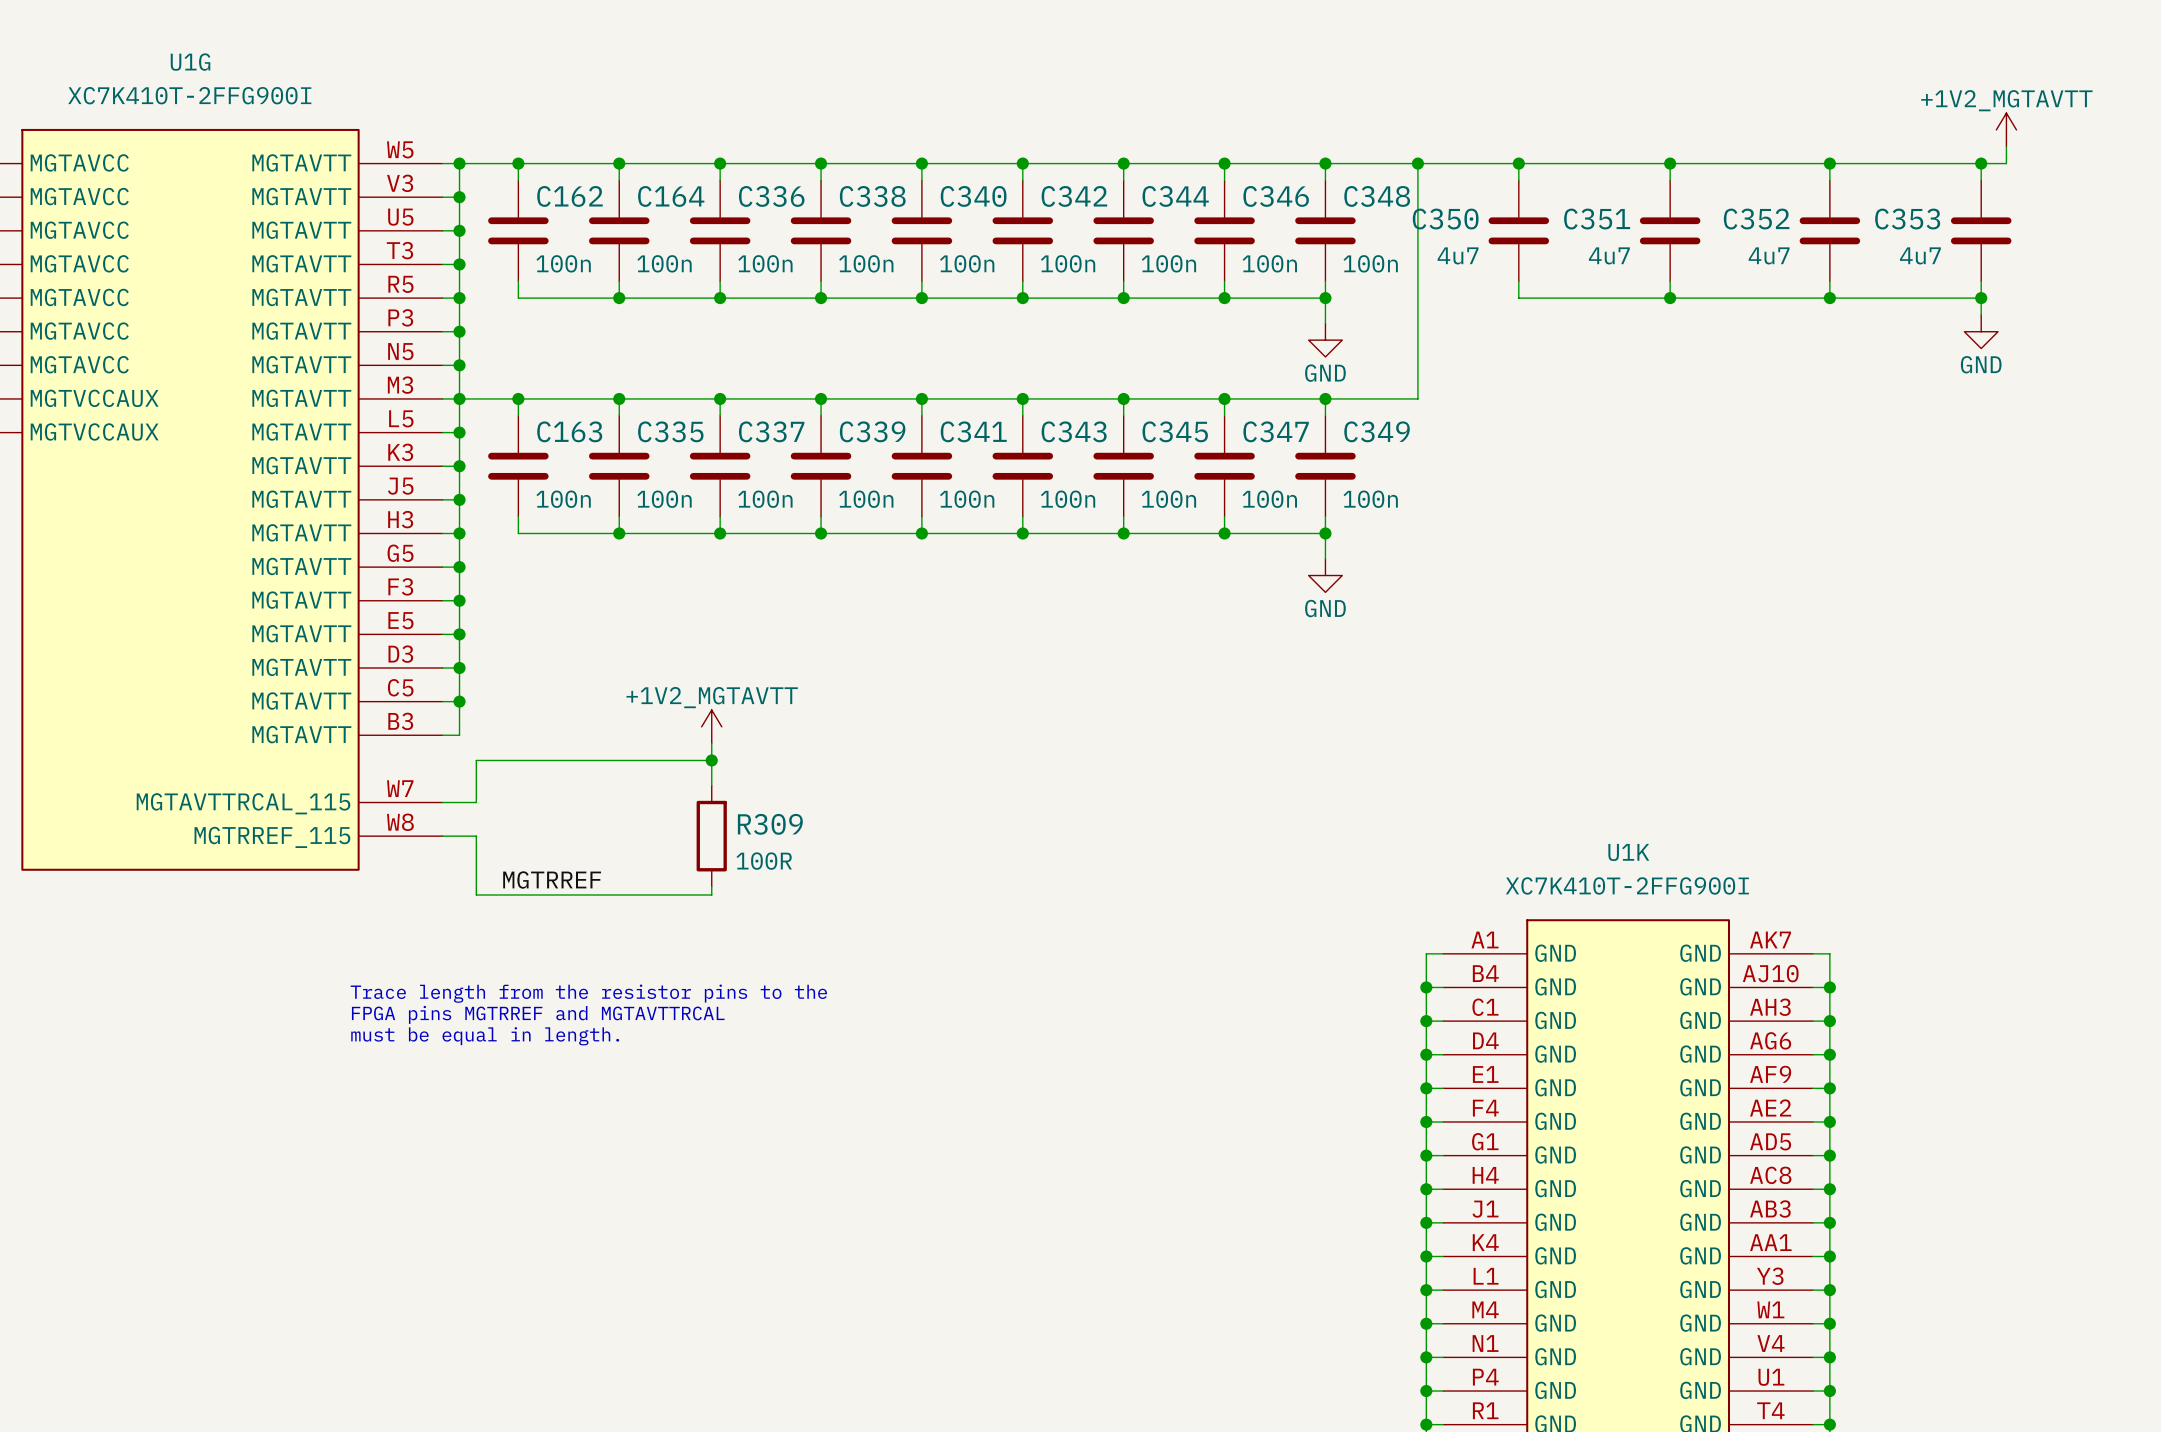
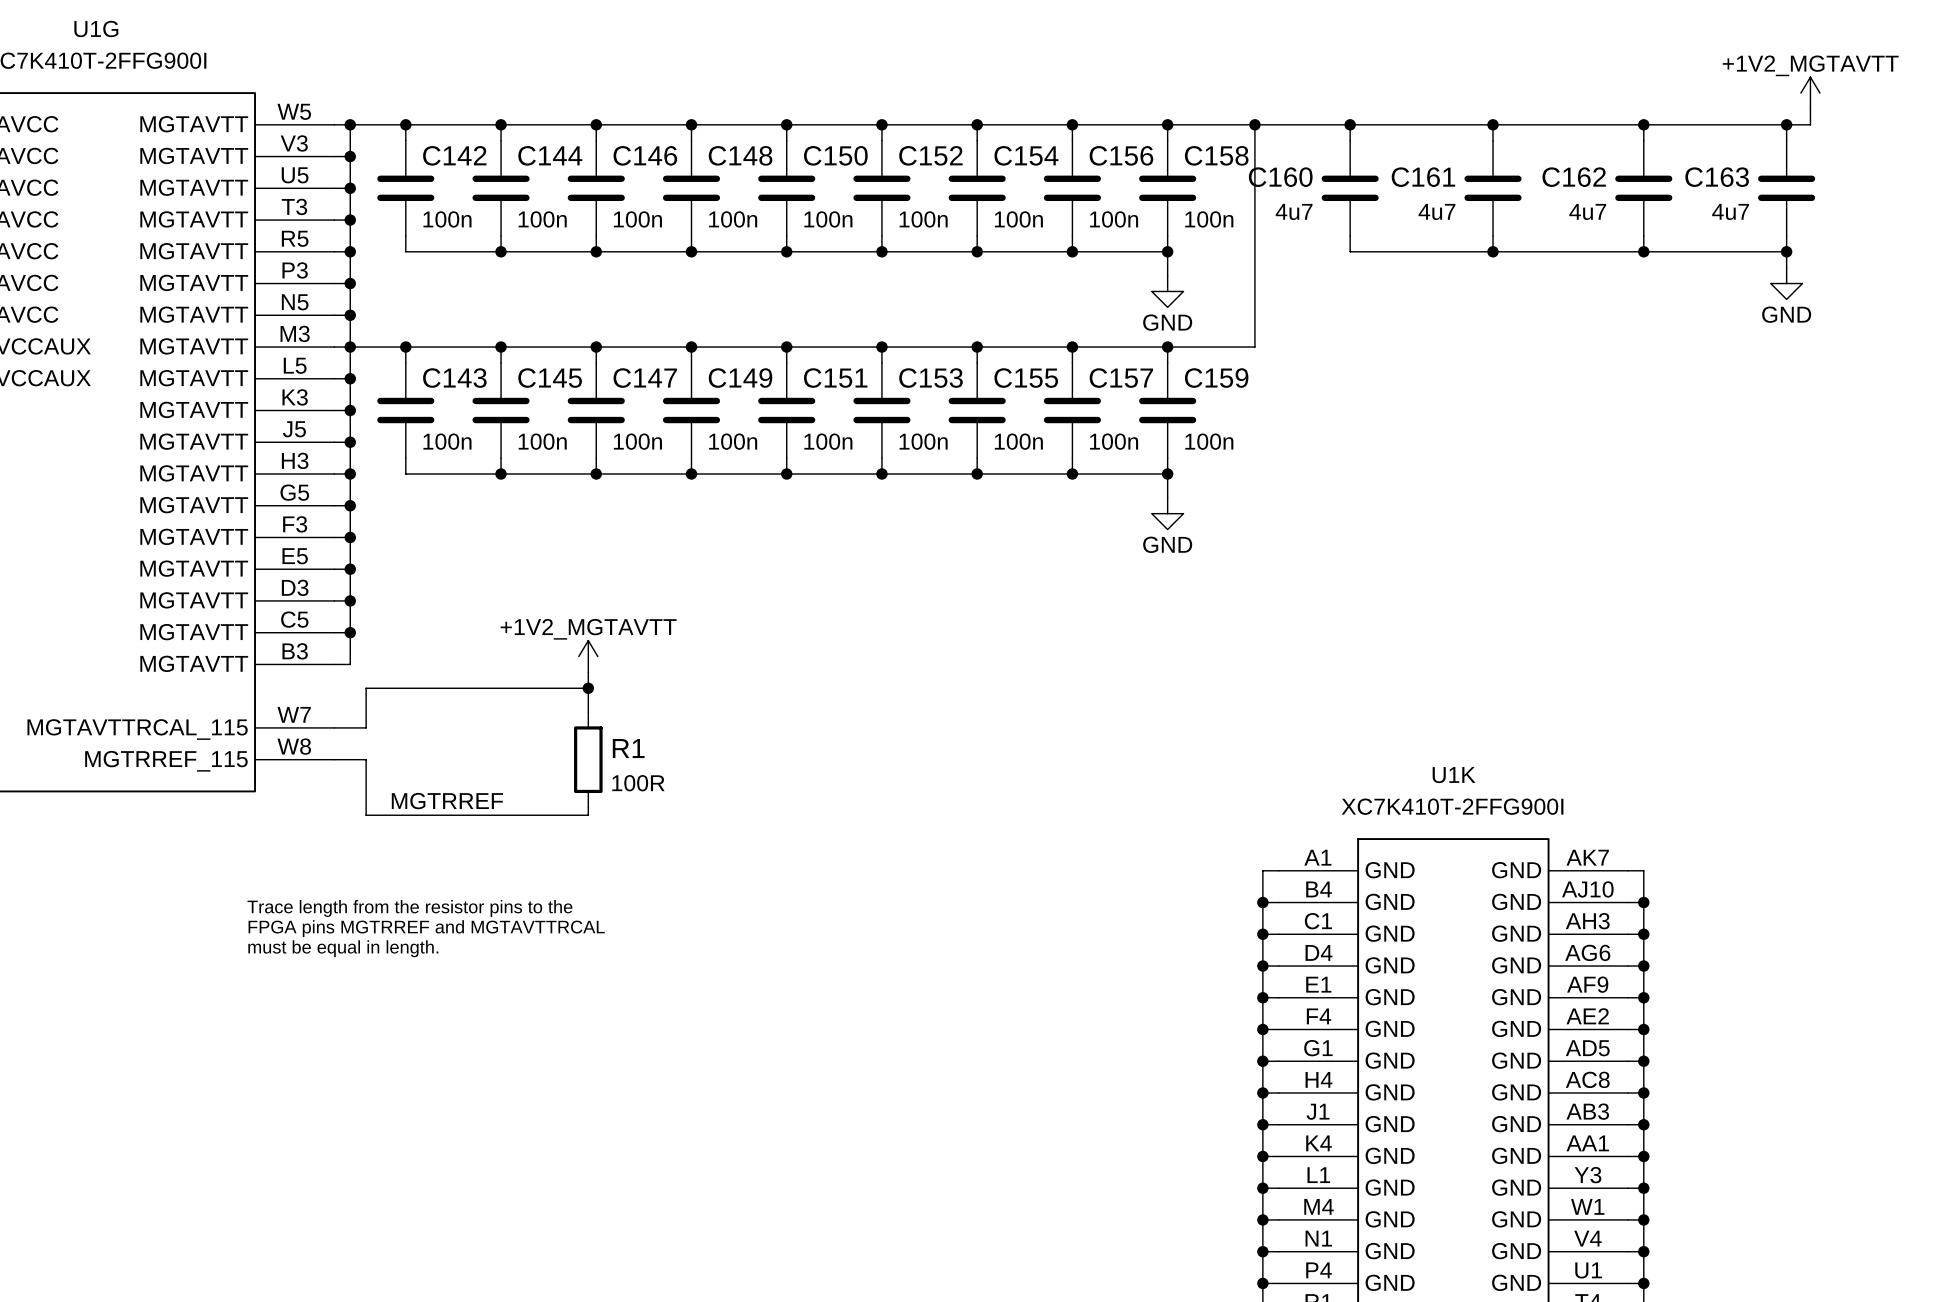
C162 name: C162 (569, 196) -> C142 (454, 155)
C164 name: C164 (671, 196) -> C144 (550, 155)
C336 name: C336 (771, 196) -> C146 (645, 155)
C338 name: C338 (872, 196) -> C148 (740, 155)
C340 name: C340 (973, 196) -> C150 (835, 155)
C342 name: C342 (1074, 196) -> C152 (930, 155)
C344 name: C344 (1175, 196) -> C154 (1026, 155)
C346 name: C346 (1276, 196) -> C156 (1121, 155)
C348 name: C348 (1377, 196) -> C158 (1216, 155)
C350 name: C350 (1445, 219) -> C160 (1280, 177)
C351 name: C351 (1597, 219) -> C161 (1423, 177)
C352 name: C352 (1756, 219) -> C162 (1574, 177)
C353 name: C353 (1907, 219) -> C163 (1717, 177)
C163 name: C163 (569, 431) -> C143 (454, 378)
C335 name: C335 (670, 431) -> C145 (550, 378)
C337 name: C337 (771, 431) -> C147 (645, 378)
C339 name: C339 (872, 431) -> C149 (740, 378)
C341 name: C341 (973, 431) -> C151 (835, 378)
C343 name: C343 (1074, 431) -> C153 (931, 378)
C345 name: C345 (1175, 431) -> C155 (1026, 378)
C347 name: C347 (1276, 431) -> C157 (1121, 378)
C349 name: C349 (1377, 431) -> C159 (1216, 378)
R309 name: R309 (770, 824) -> R1 (628, 748)

